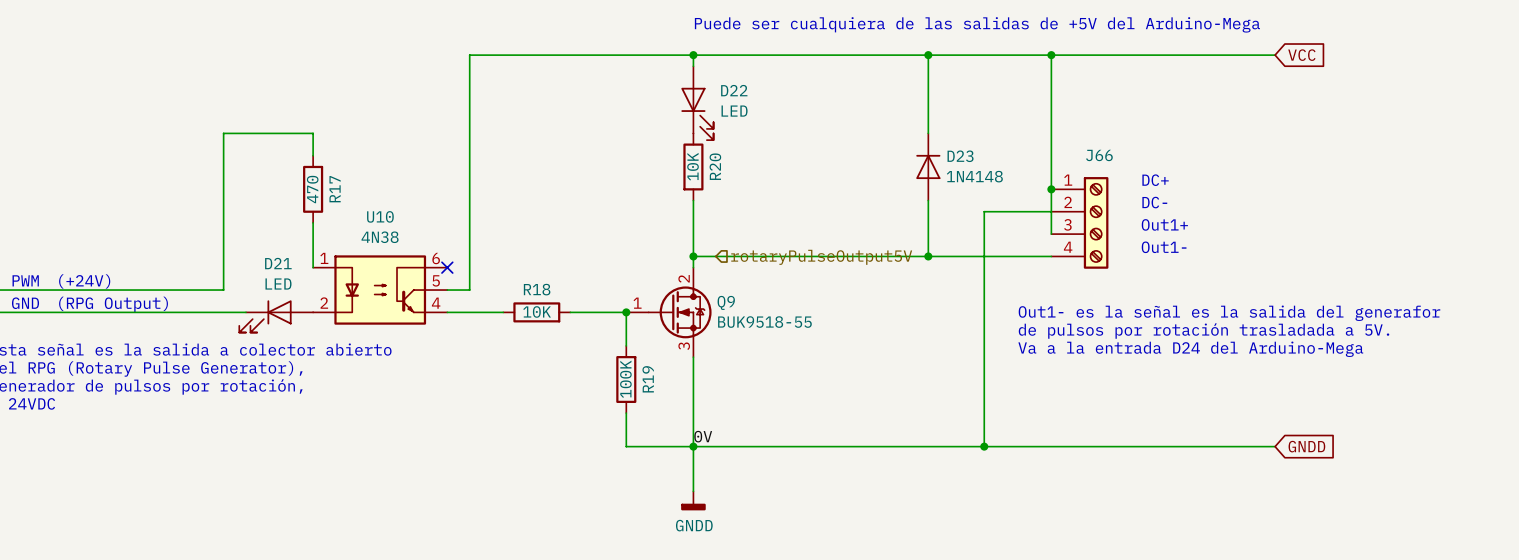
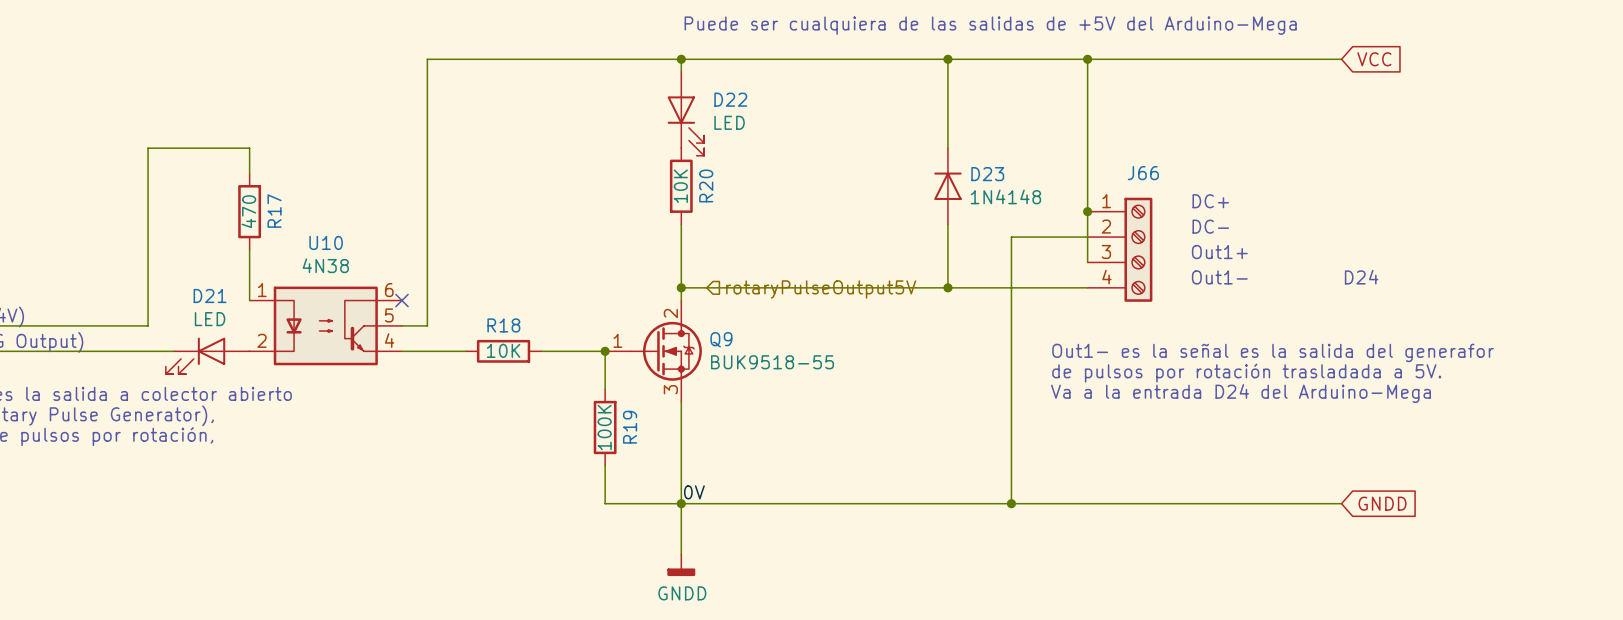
text: none -> D24 (1361, 277)

